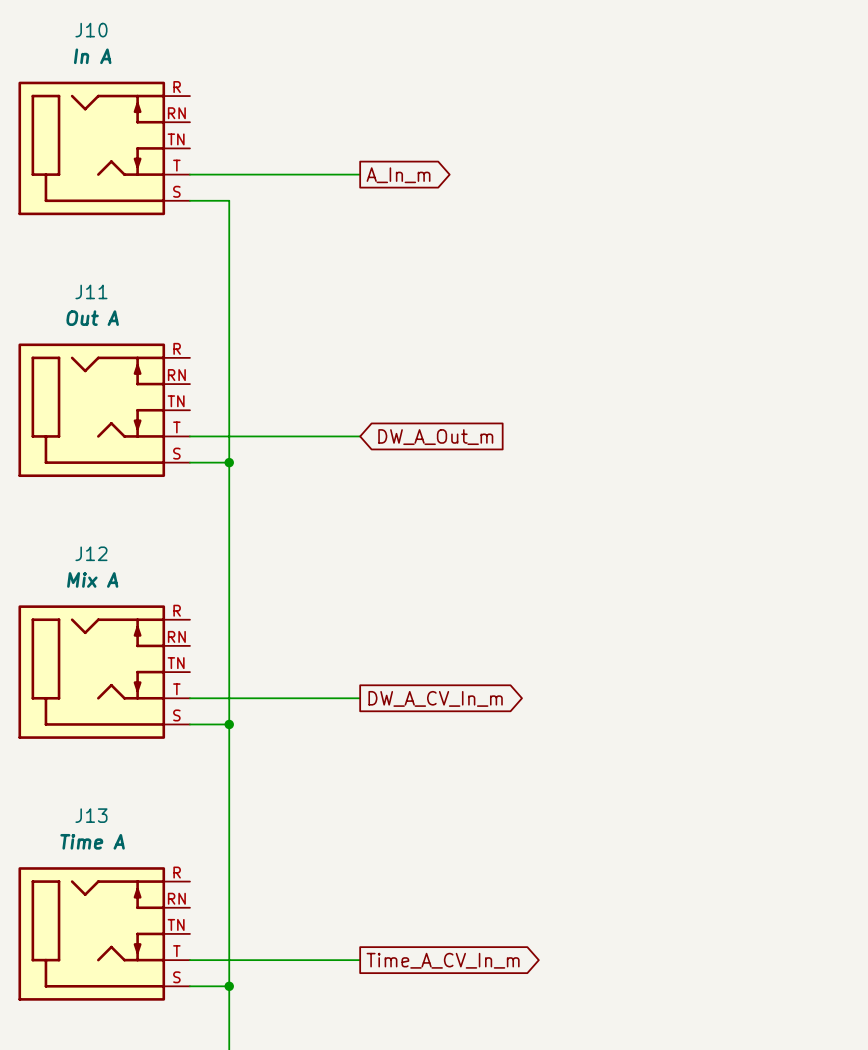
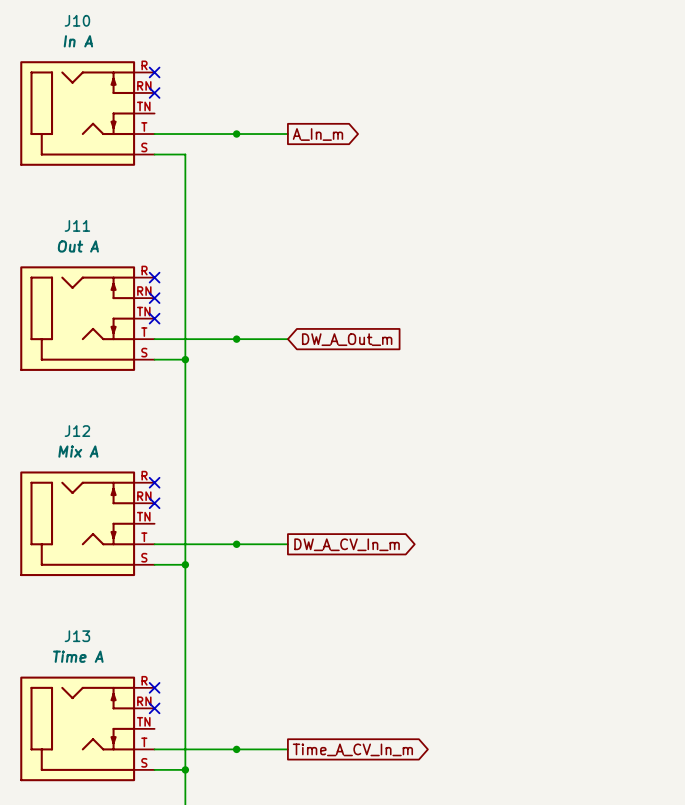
no-connect mark: none -> (154, 72)
no-connect mark: none -> (154, 92)
junction: none -> (236, 134)
no-connect mark: none -> (154, 277)
no-connect mark: none -> (154, 298)
no-connect mark: none -> (154, 318)
junction: none -> (236, 339)
no-connect mark: none -> (154, 482)
no-connect mark: none -> (154, 503)
junction: none -> (236, 544)
no-connect mark: none -> (154, 687)
no-connect mark: none -> (154, 708)
junction: none -> (236, 749)

